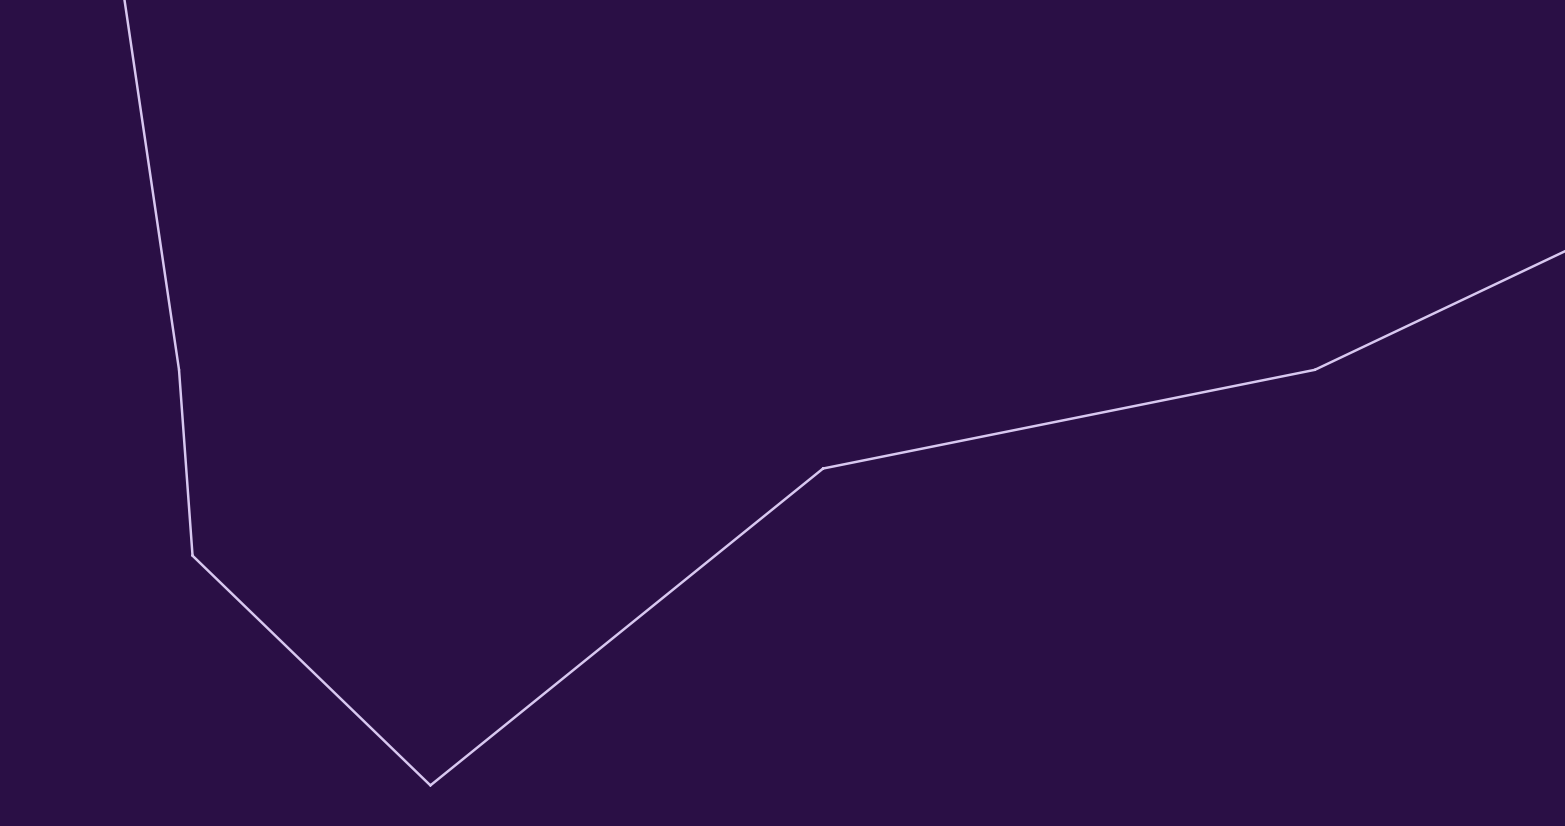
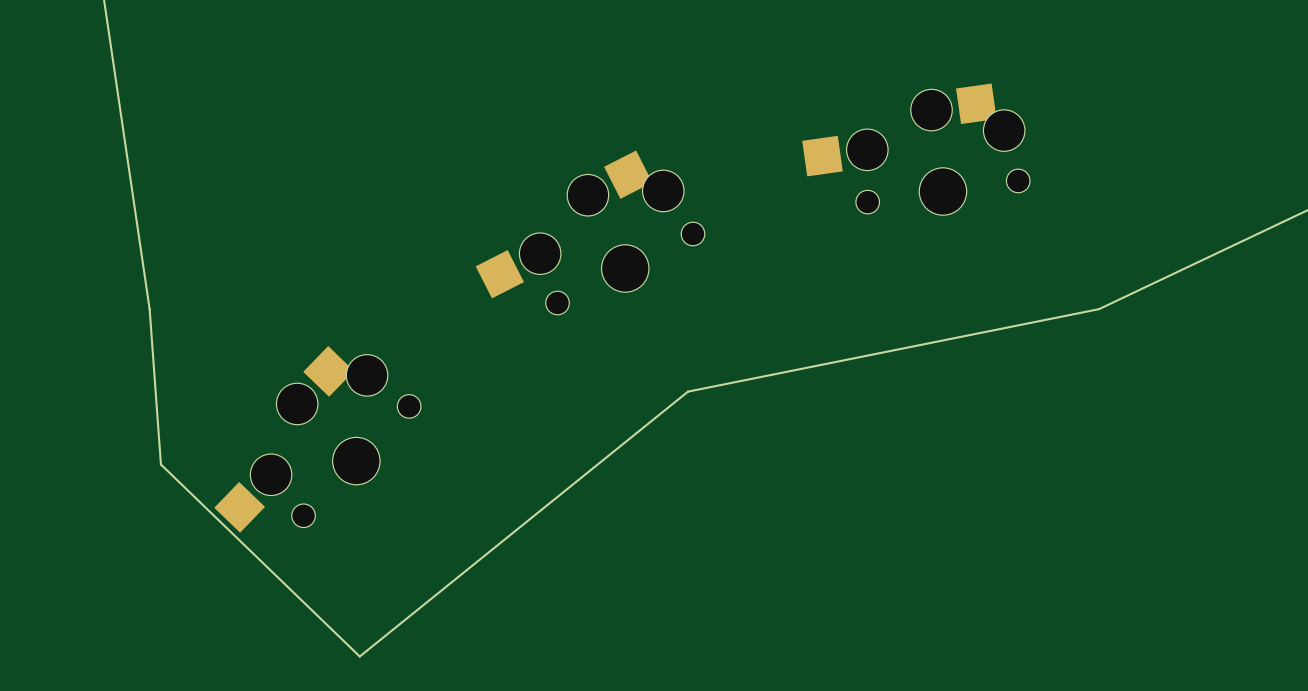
part: none -> (916, 149)
part: none -> (590, 232)
part: none -> (317, 439)

